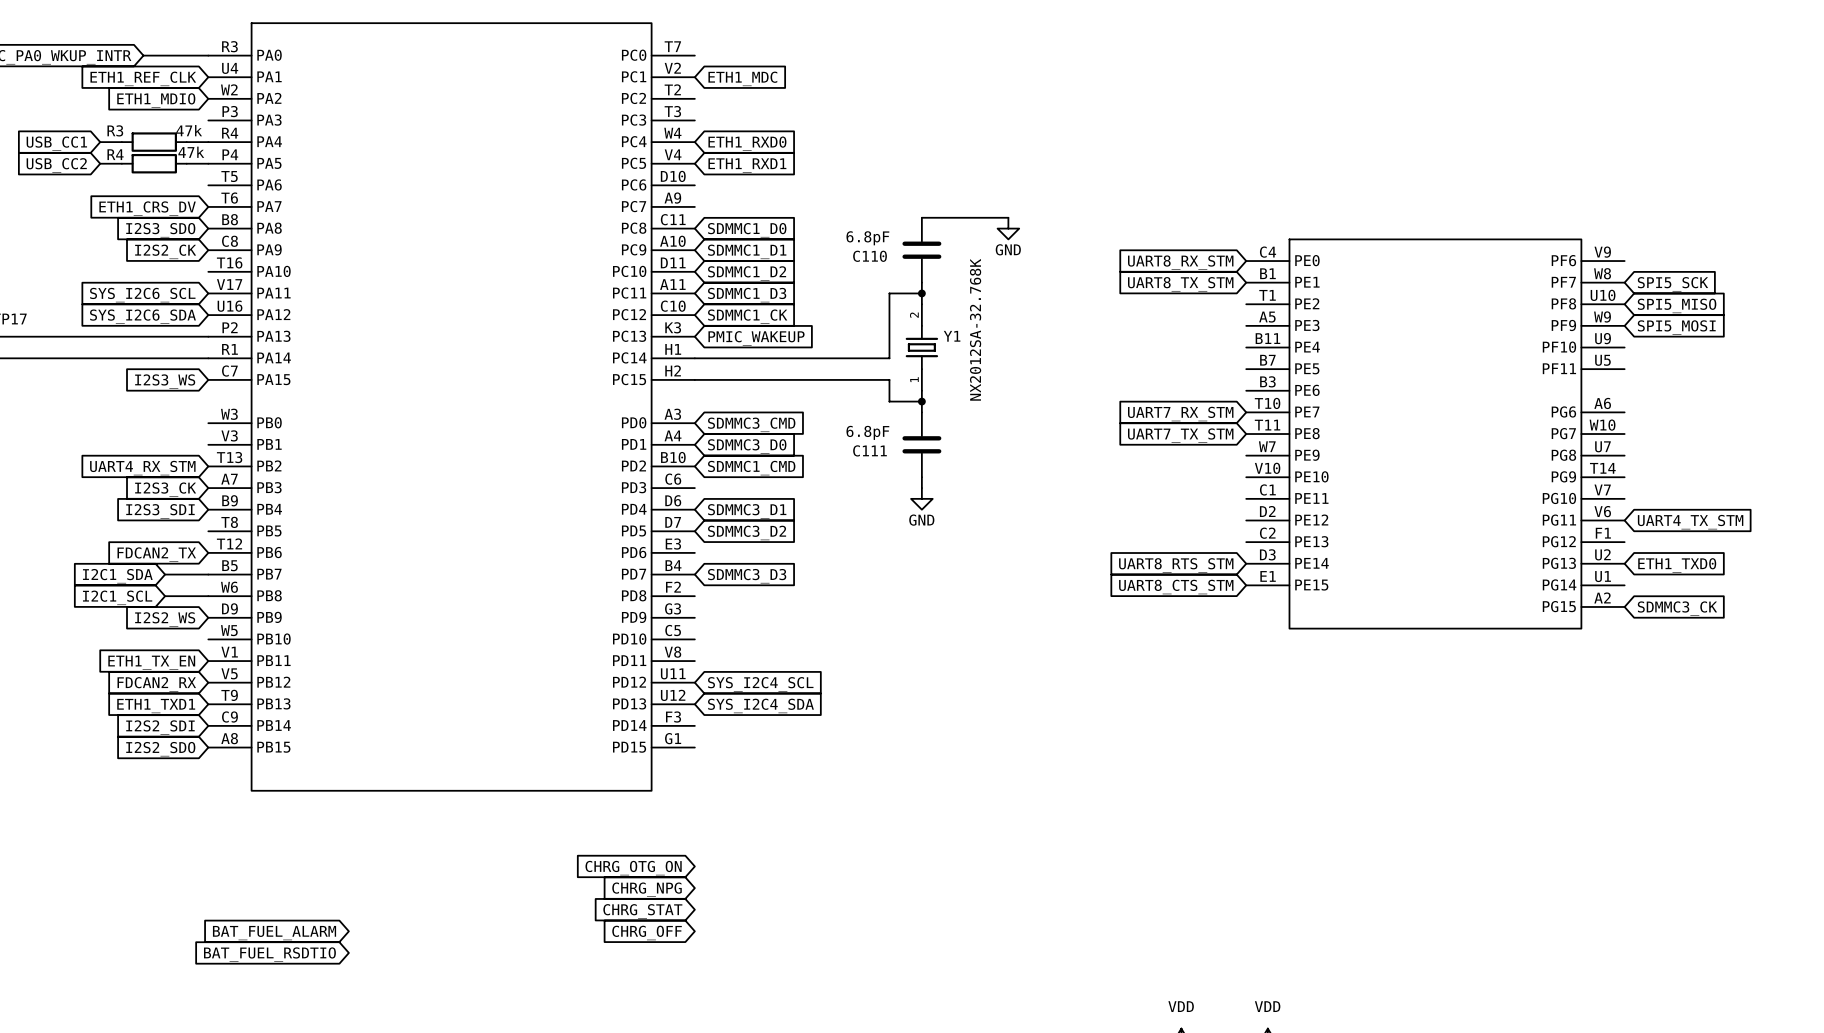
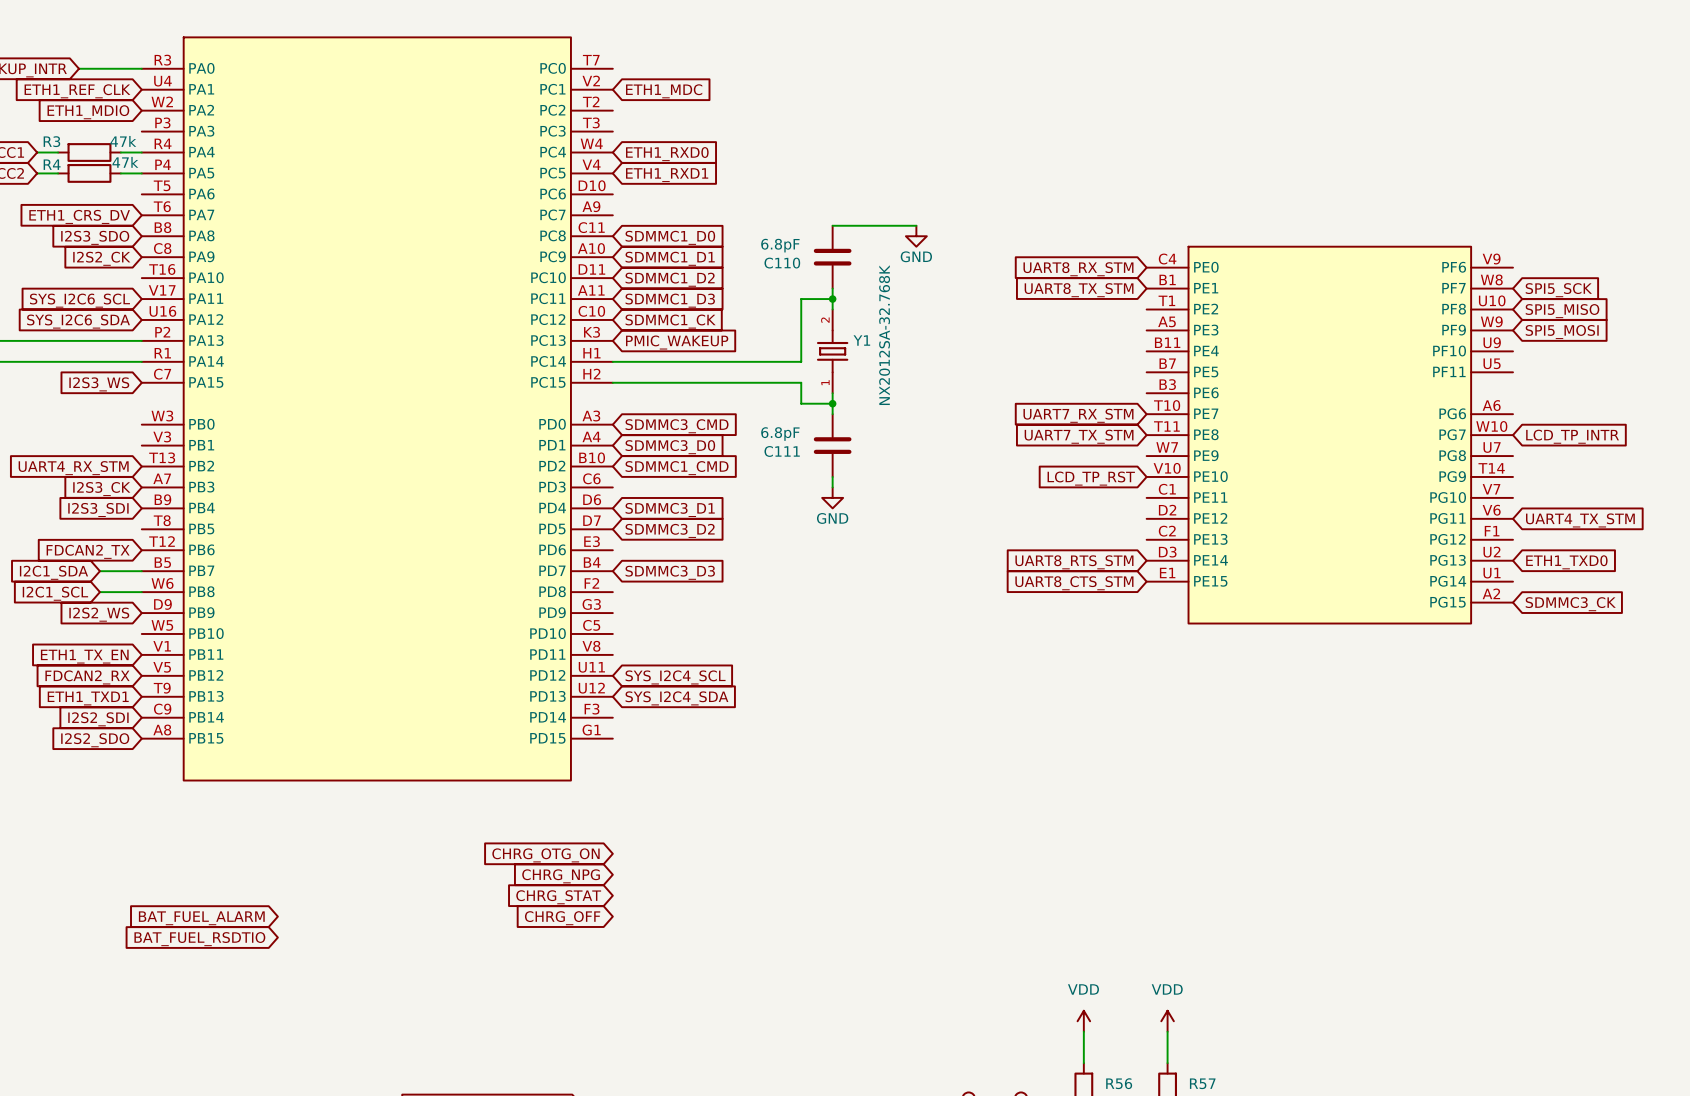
global label: none -> LCD_TP_INTR (1572, 436)
global label: none -> LCD_TP_RST (1091, 478)

